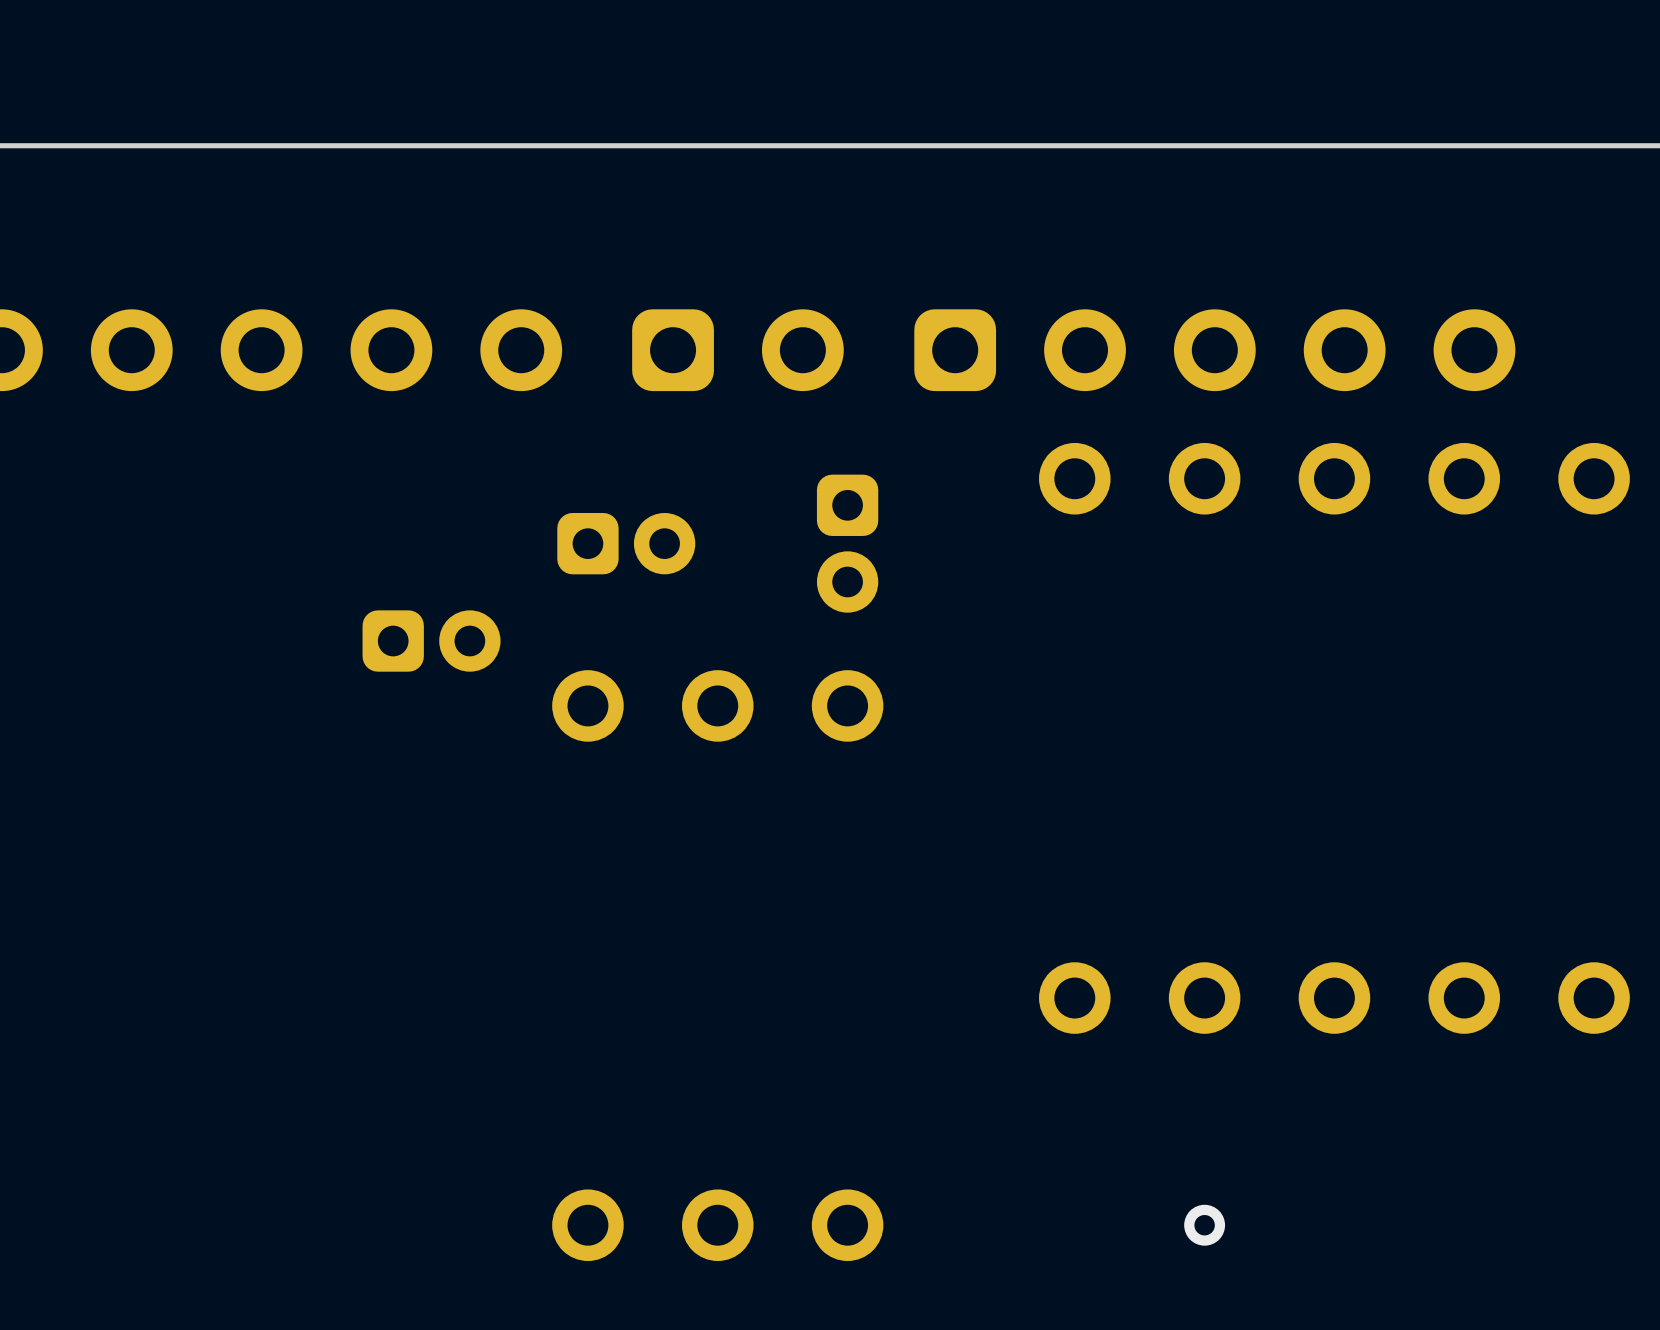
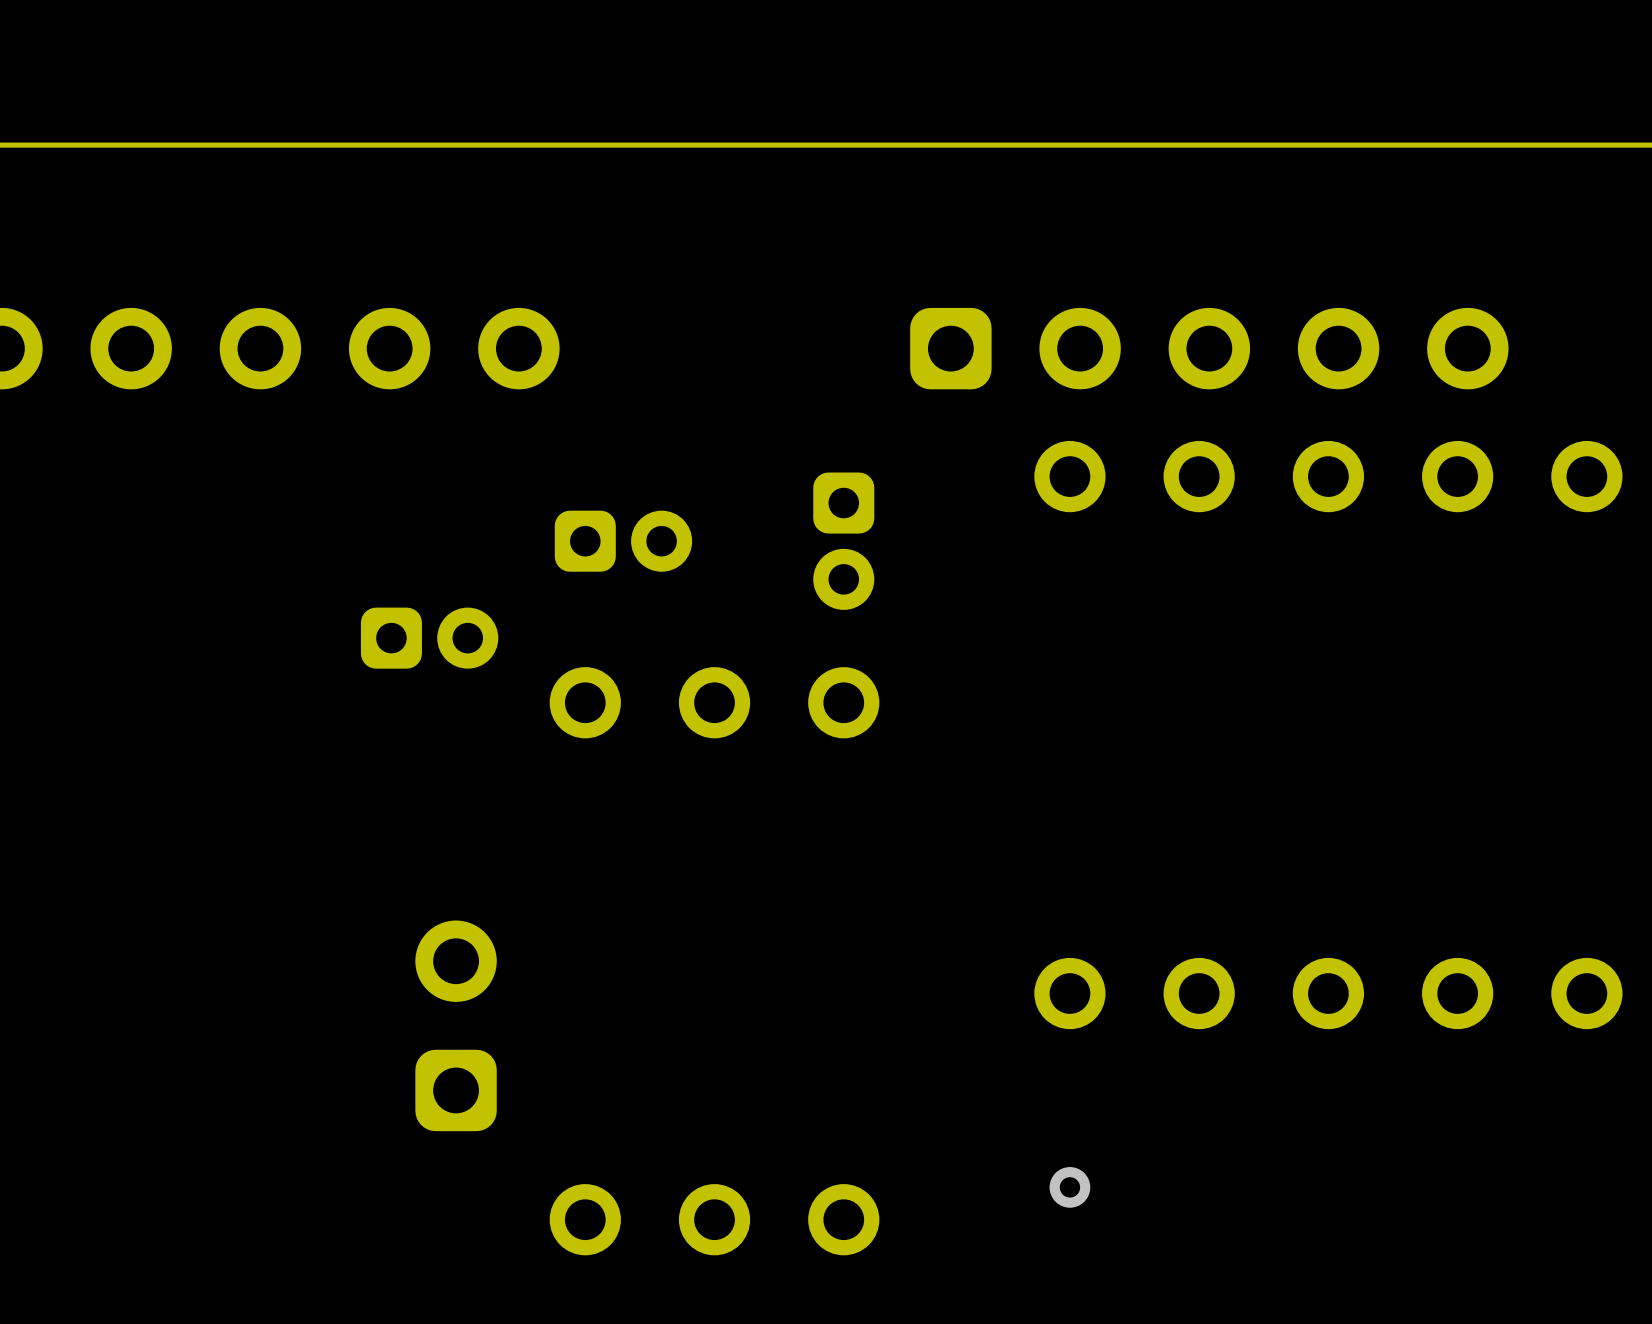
part rotation: 0° (737, 350) -> 90° counterclockwise (456, 1025)
part position: (737, 350) -> (456, 1025)
via: none -> (1069, 1187)
via: (1204, 1225) -> none

